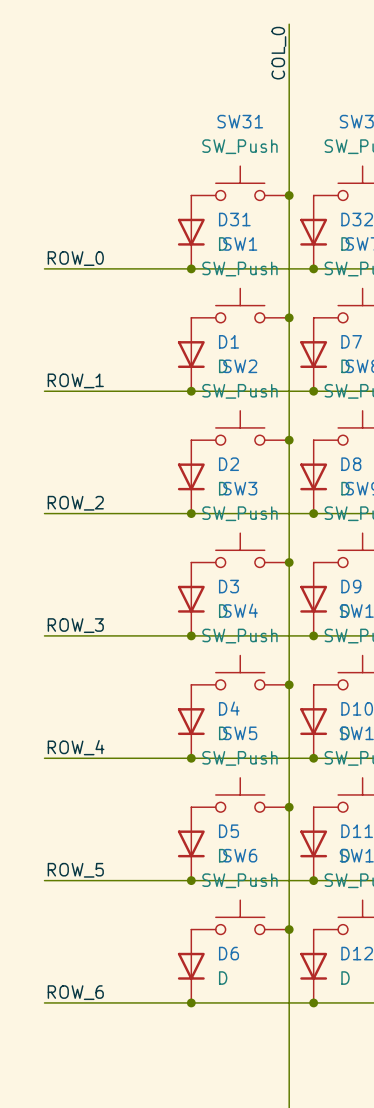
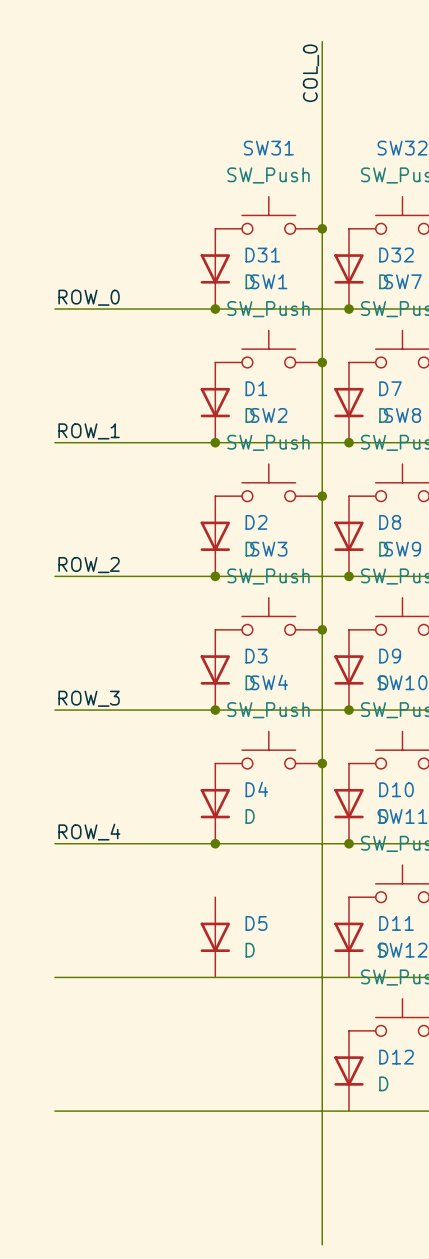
SW5: SW_Push (240, 794) -> none
junction: (289, 807) -> none
label: ROW_5 (75, 870) -> none
junction: (191, 880) -> none
junction: (313, 880) -> none
SW6: SW_Push (240, 917) -> none
junction: (289, 929) -> none
D6: D (191, 966) -> none
label: ROW_6 (75, 992) -> none
junction: (191, 1002) -> none
junction: (313, 1002) -> none

